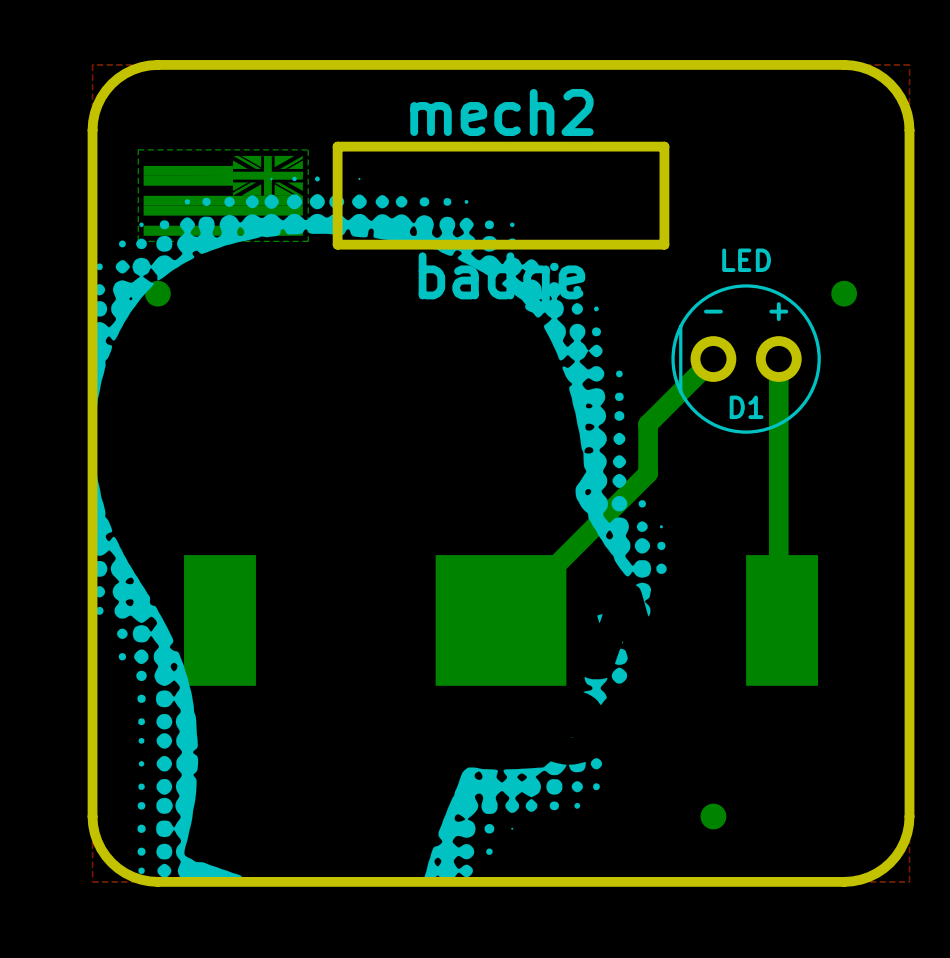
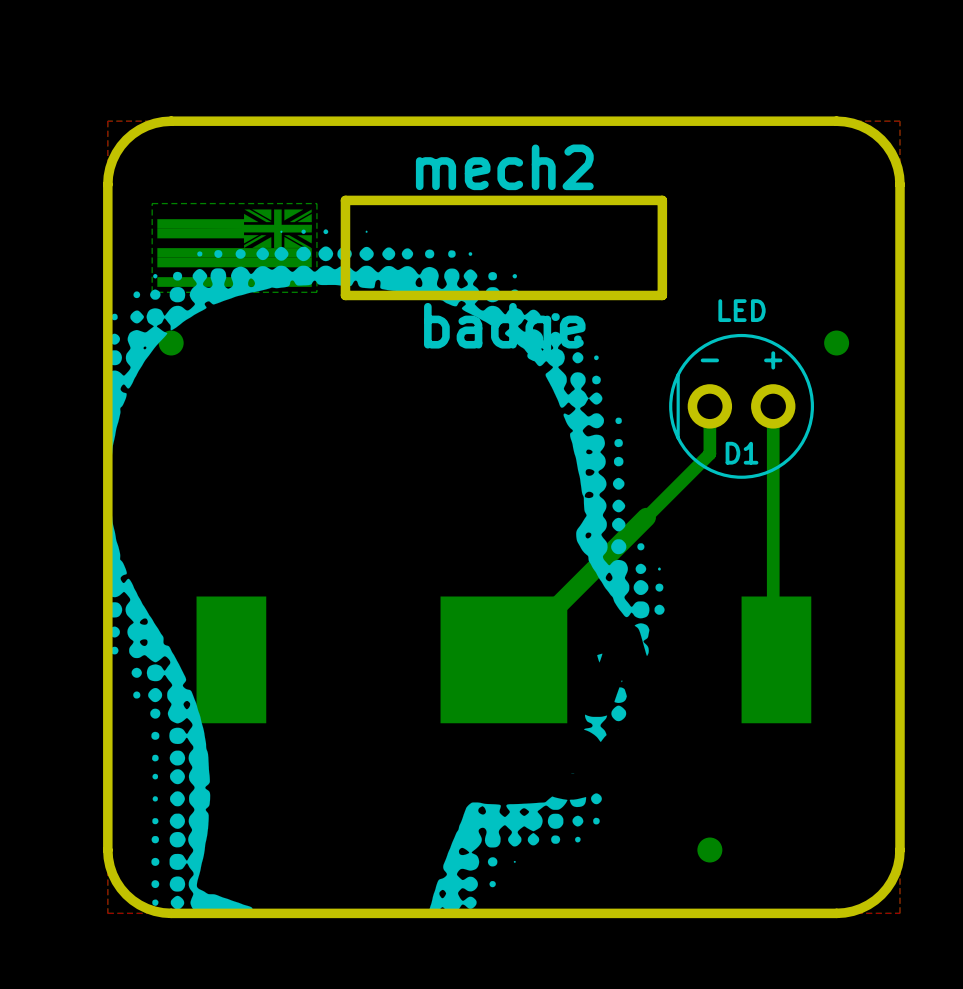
bottom track: (713, 359) (648, 424) (648, 473) -> (709, 406) (709, 453) (646, 517)
bottom track width: thick (778, 359) (778, 617) -> thin (773, 406) (773, 656)

